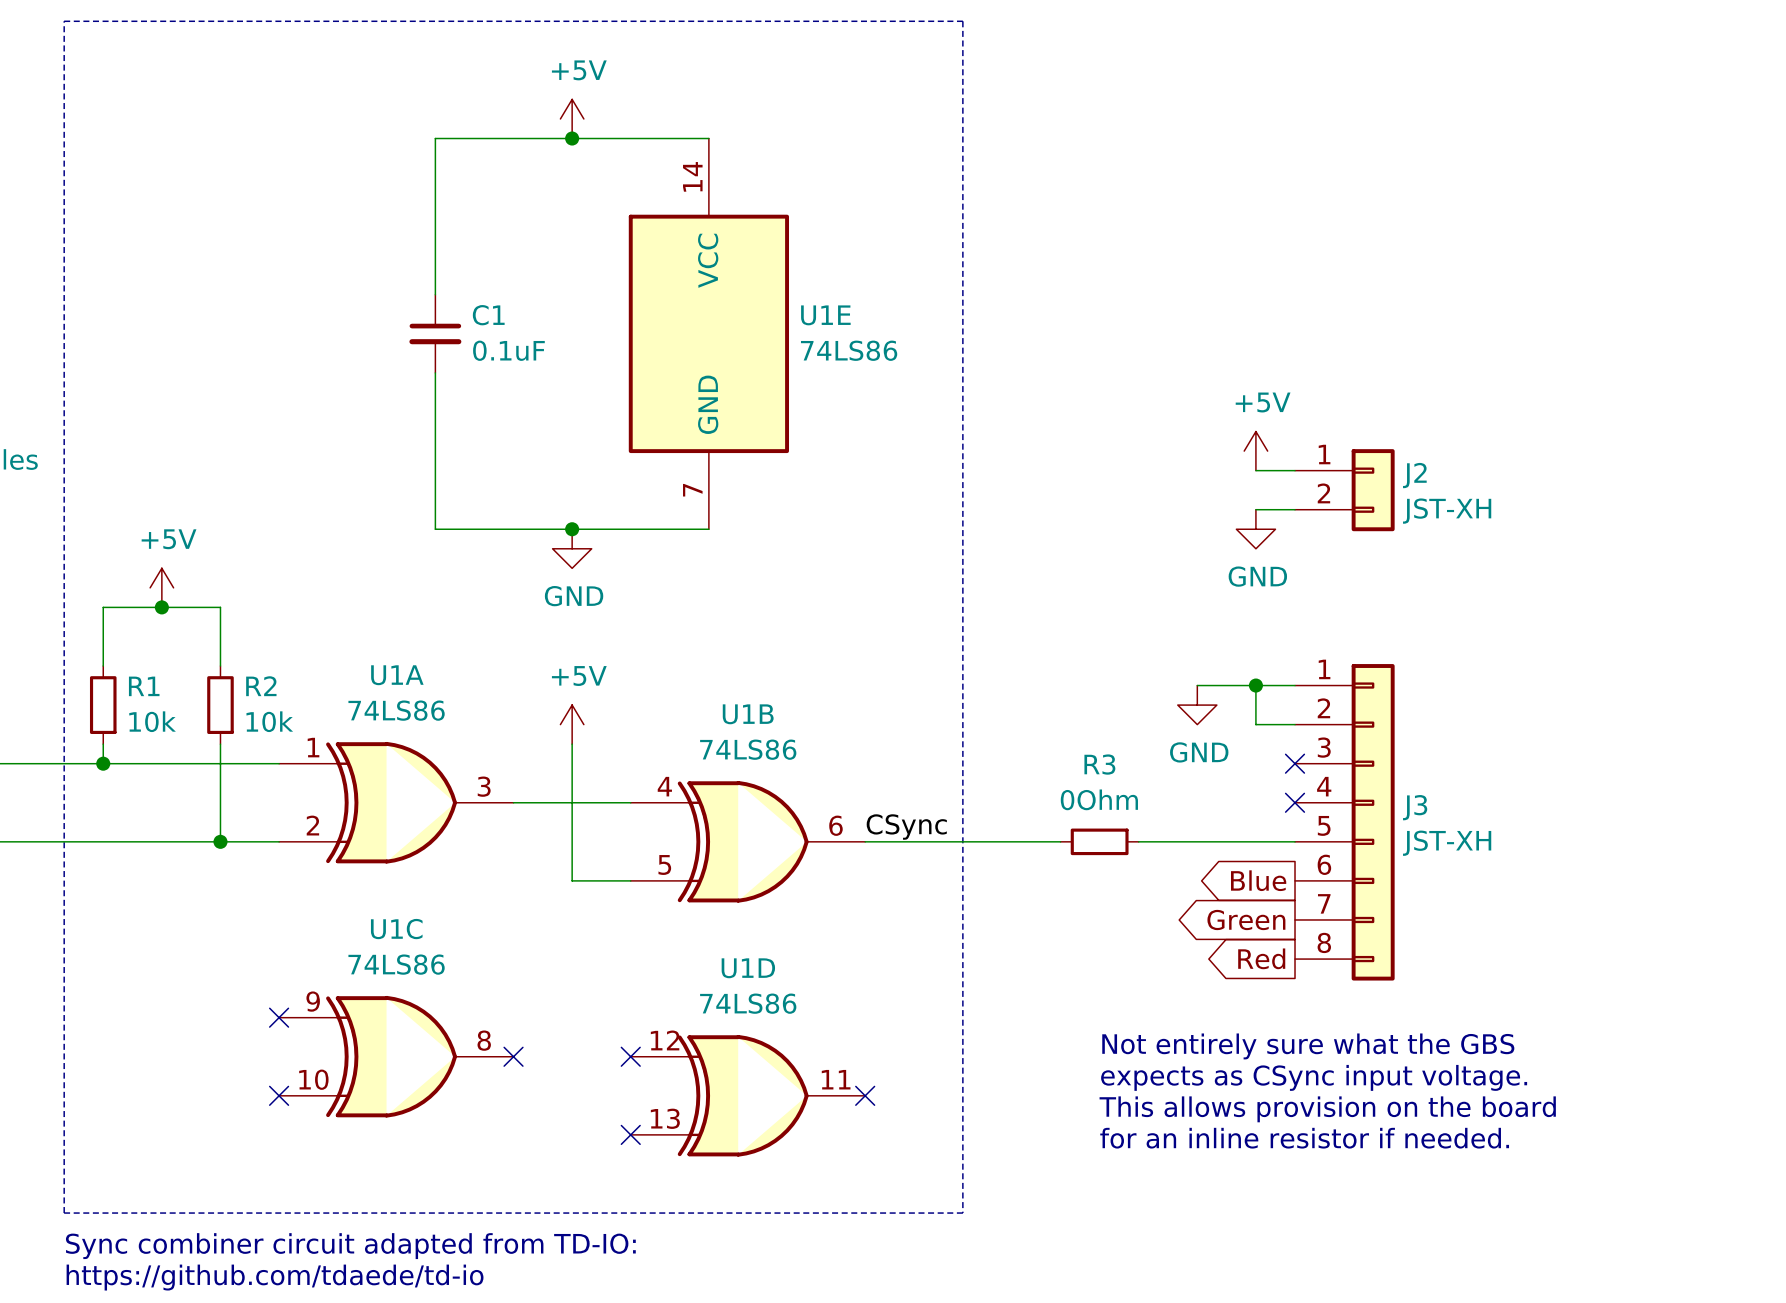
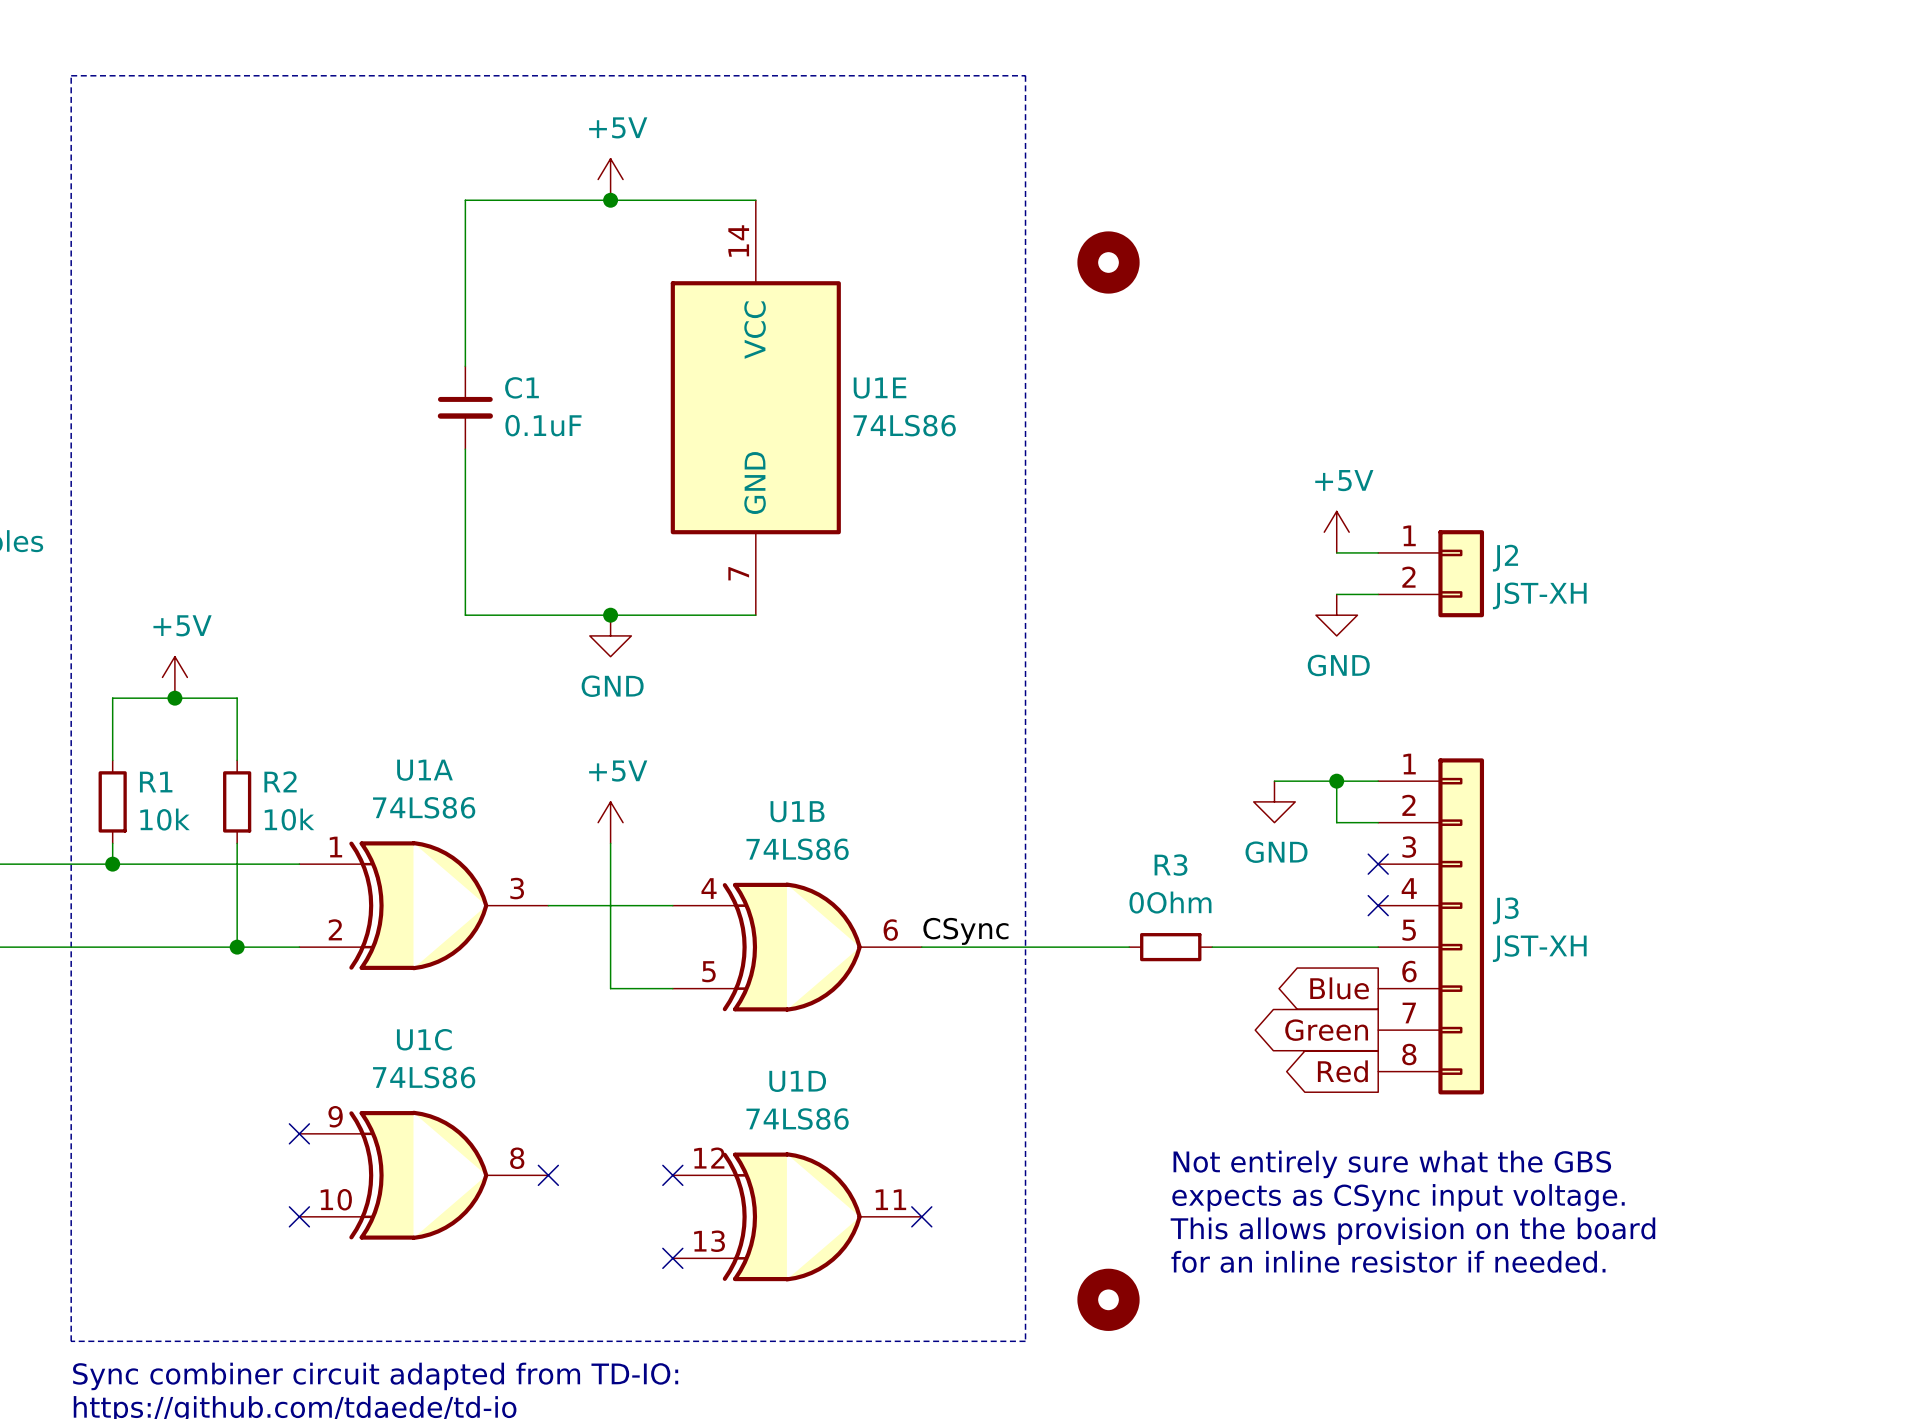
part: none -> (1108, 262)
part: none -> (1108, 1299)

